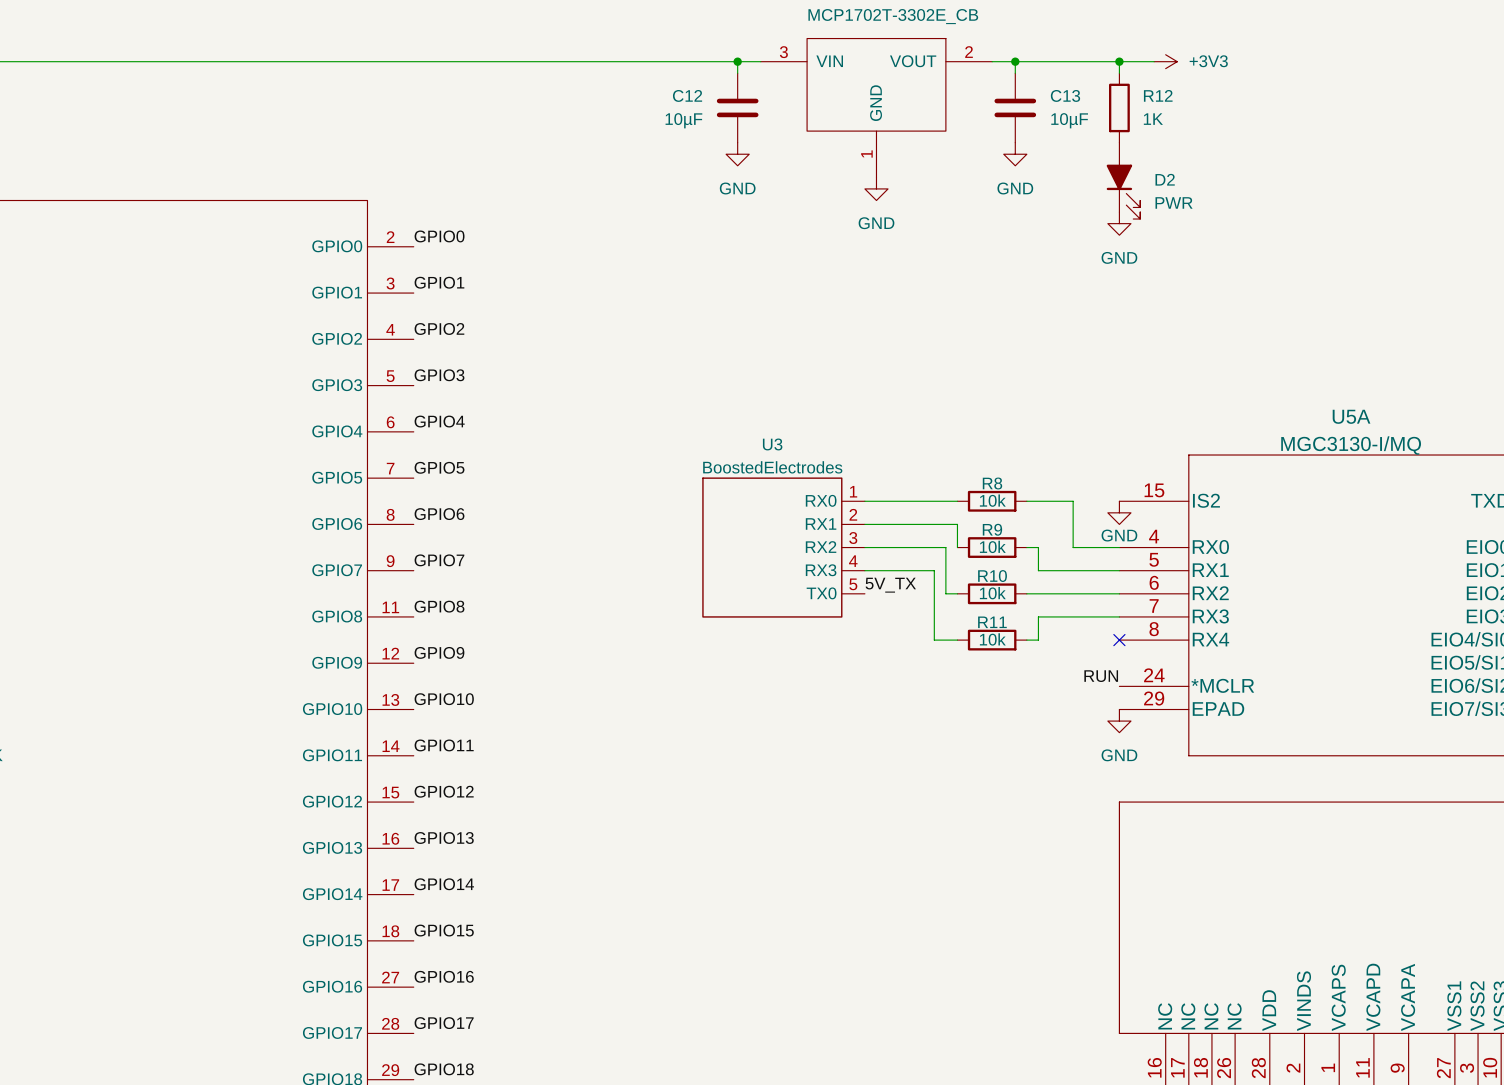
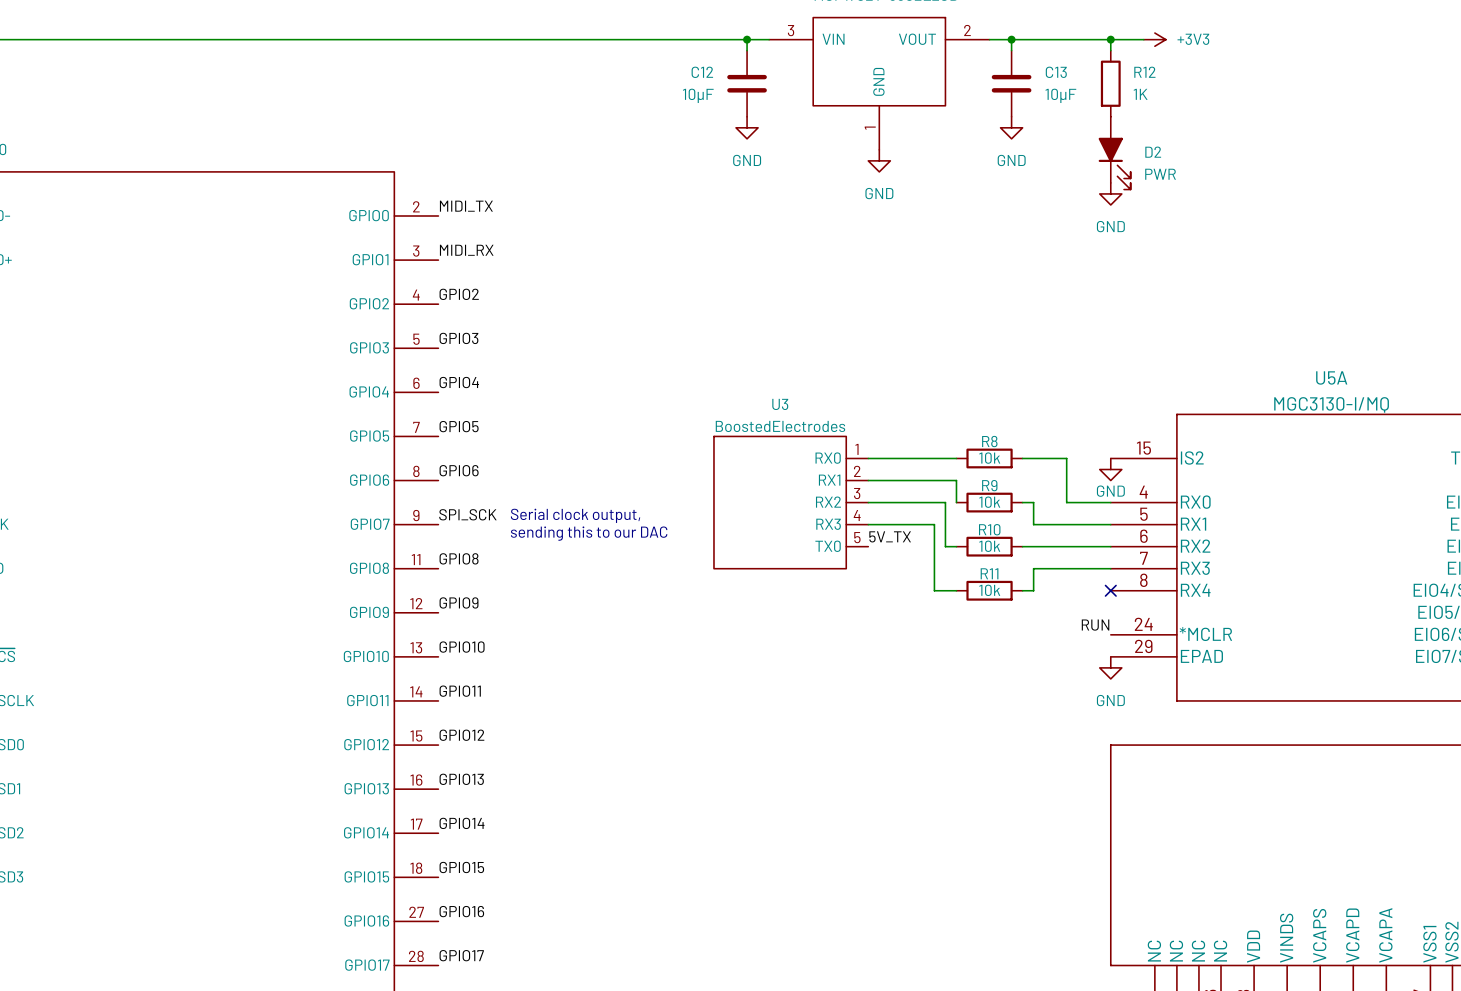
label: GPIO0 (439, 236) -> MIDI_TX (466, 206)
label: GPIO1 (439, 282) -> MIDI_RX (466, 250)
label: GPIO7 (439, 560) -> SPI_SCK (467, 514)
text: none -> Serial clock output, (575, 515)
text: none -> sending this to our DAC (589, 533)

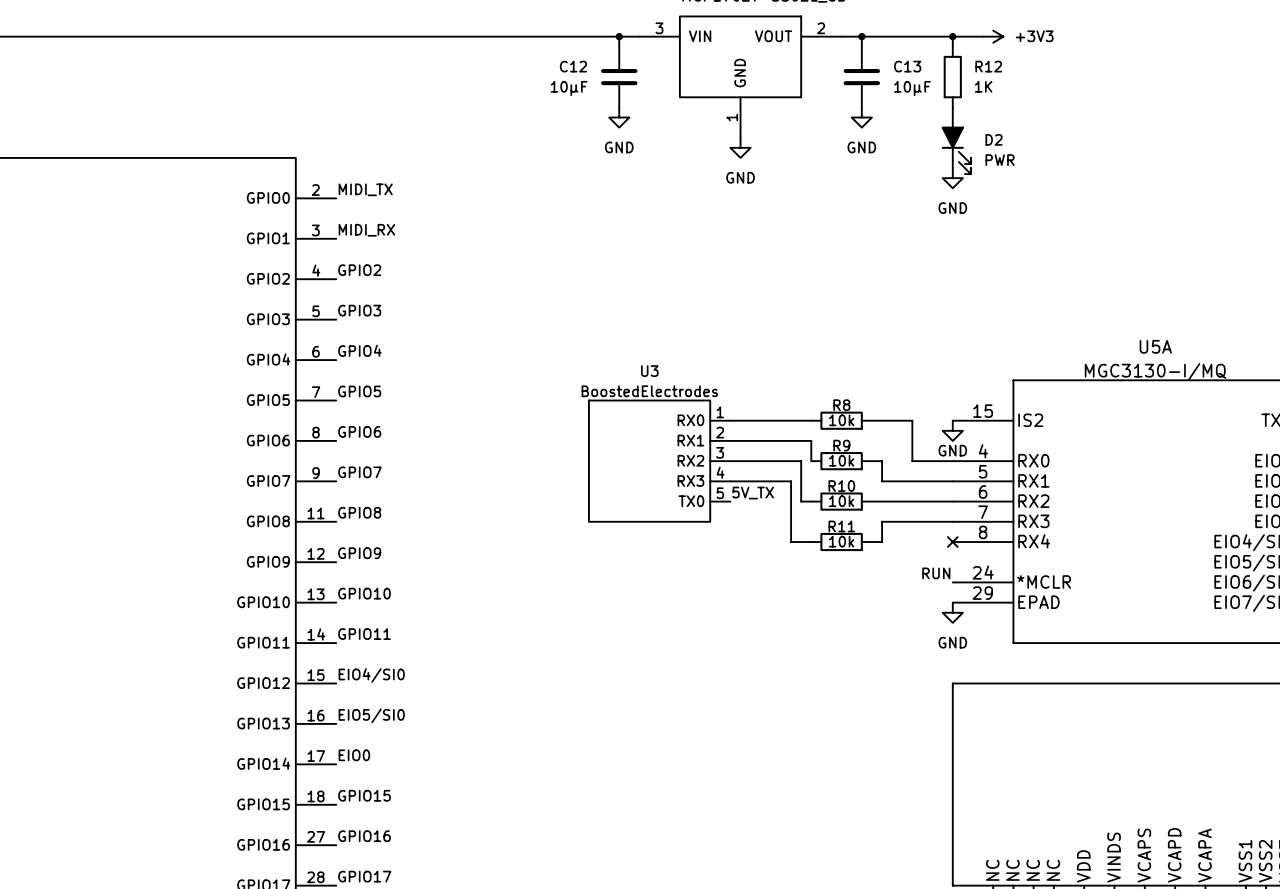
label: SPI_SCK (467, 514) -> GPIO7 (359, 472)
text: Serial clock output, (575, 515) -> none
text: sending this to our DAC (589, 533) -> none
label: GPIO12 (461, 735) -> EIO4/SI0 (371, 675)
label: GPIO13 (461, 779) -> EIO5/SI0 (371, 715)
label: GPIO14 (462, 823) -> EIO0 (354, 755)

